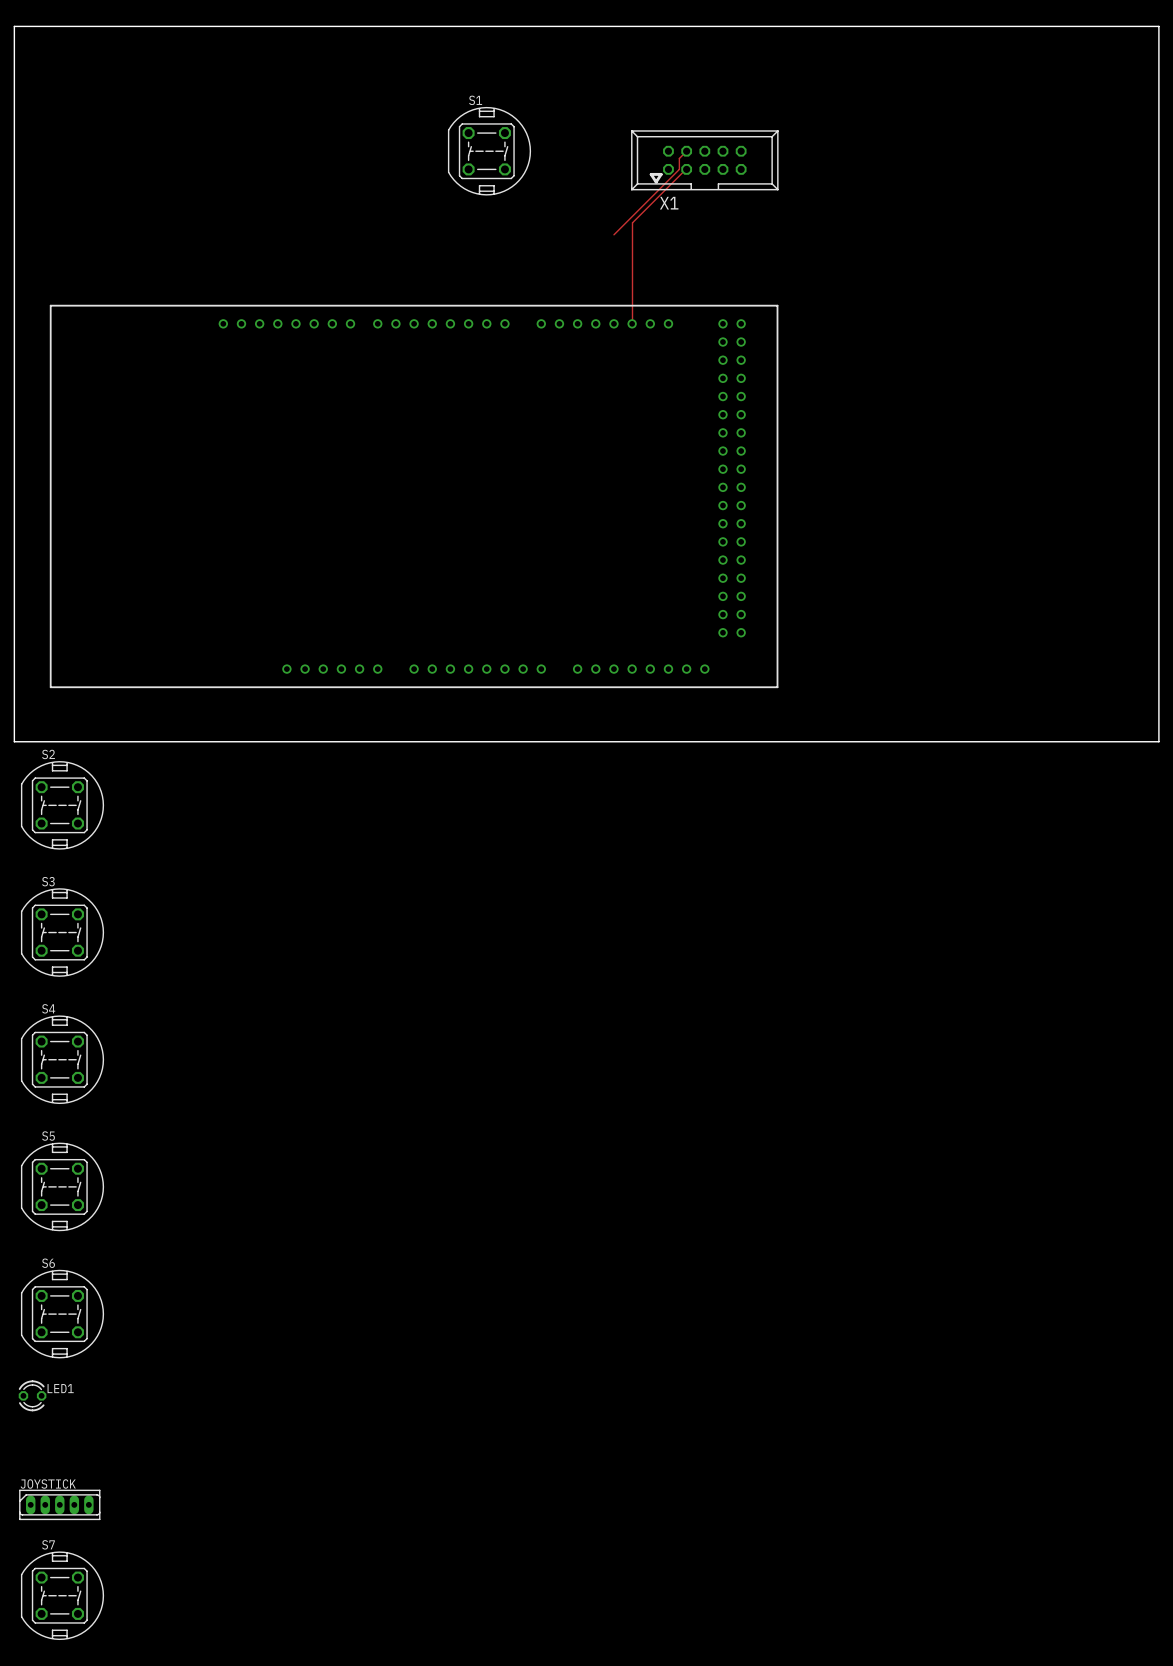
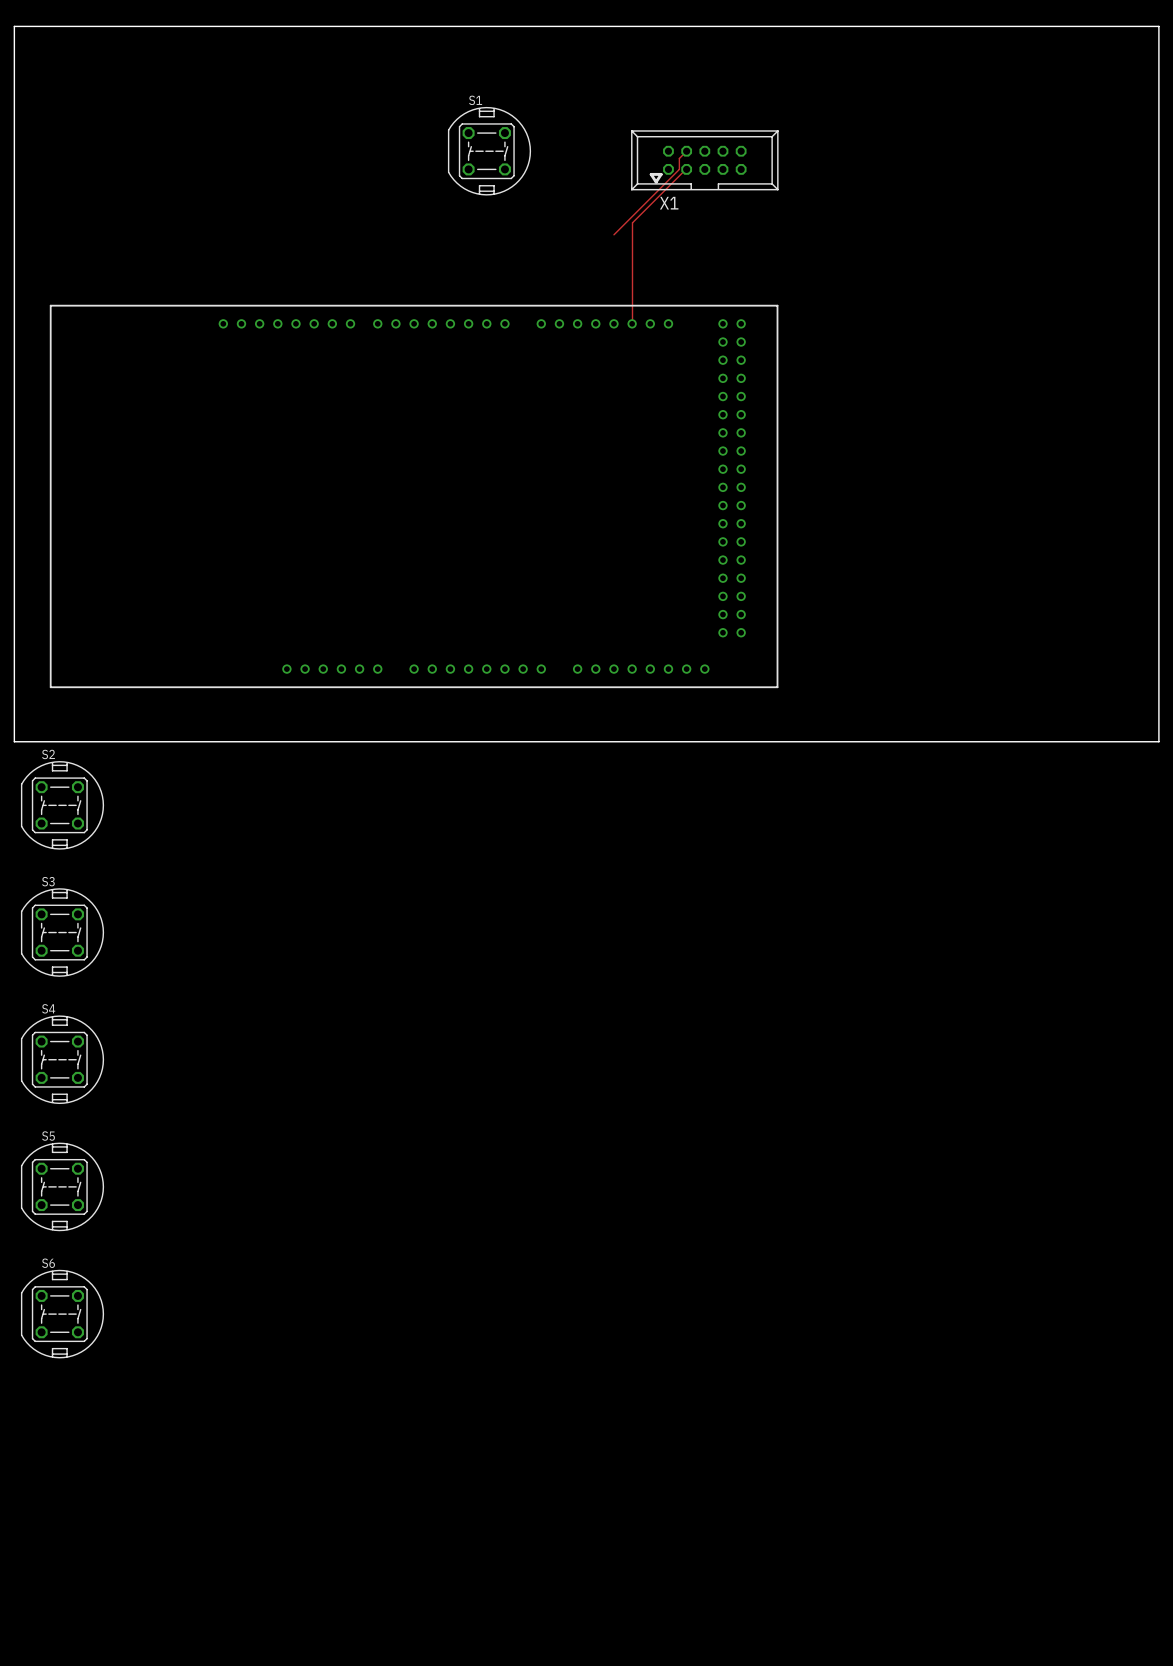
LED1: (32, 1395) -> none
JOYSTICK: (59, 1504) -> none
S7: (62, 1595) -> none

